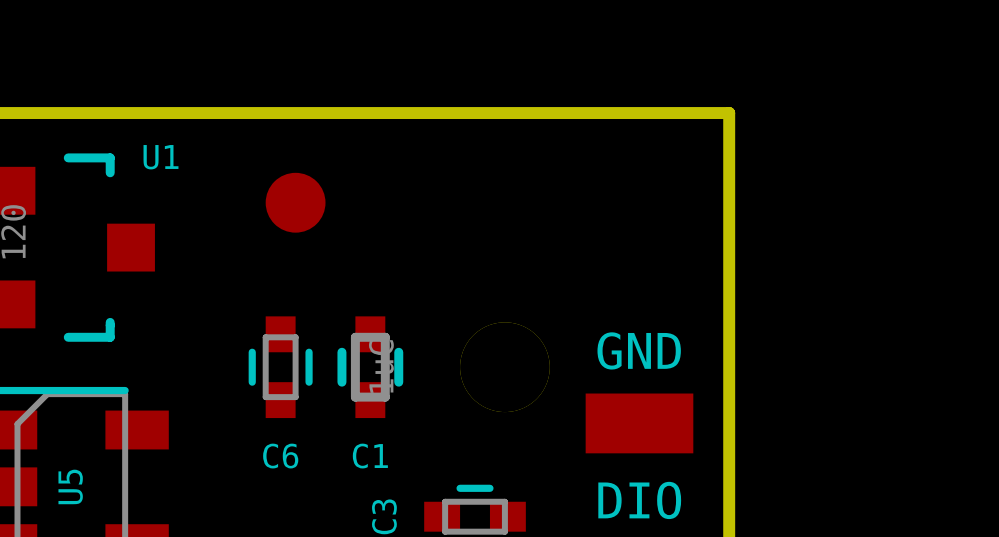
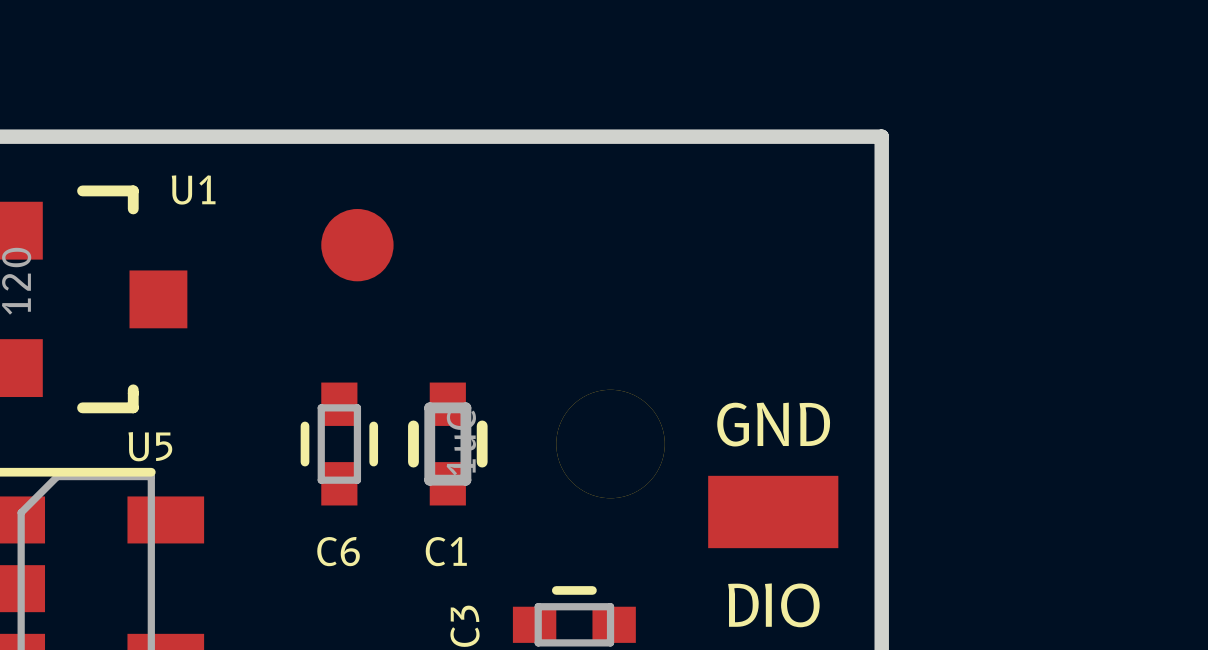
U5 name rotation: 0° (70, 486) -> 90° clockwise (150, 446)
U5 name position: U5 (70, 486) -> U5 (150, 446)

